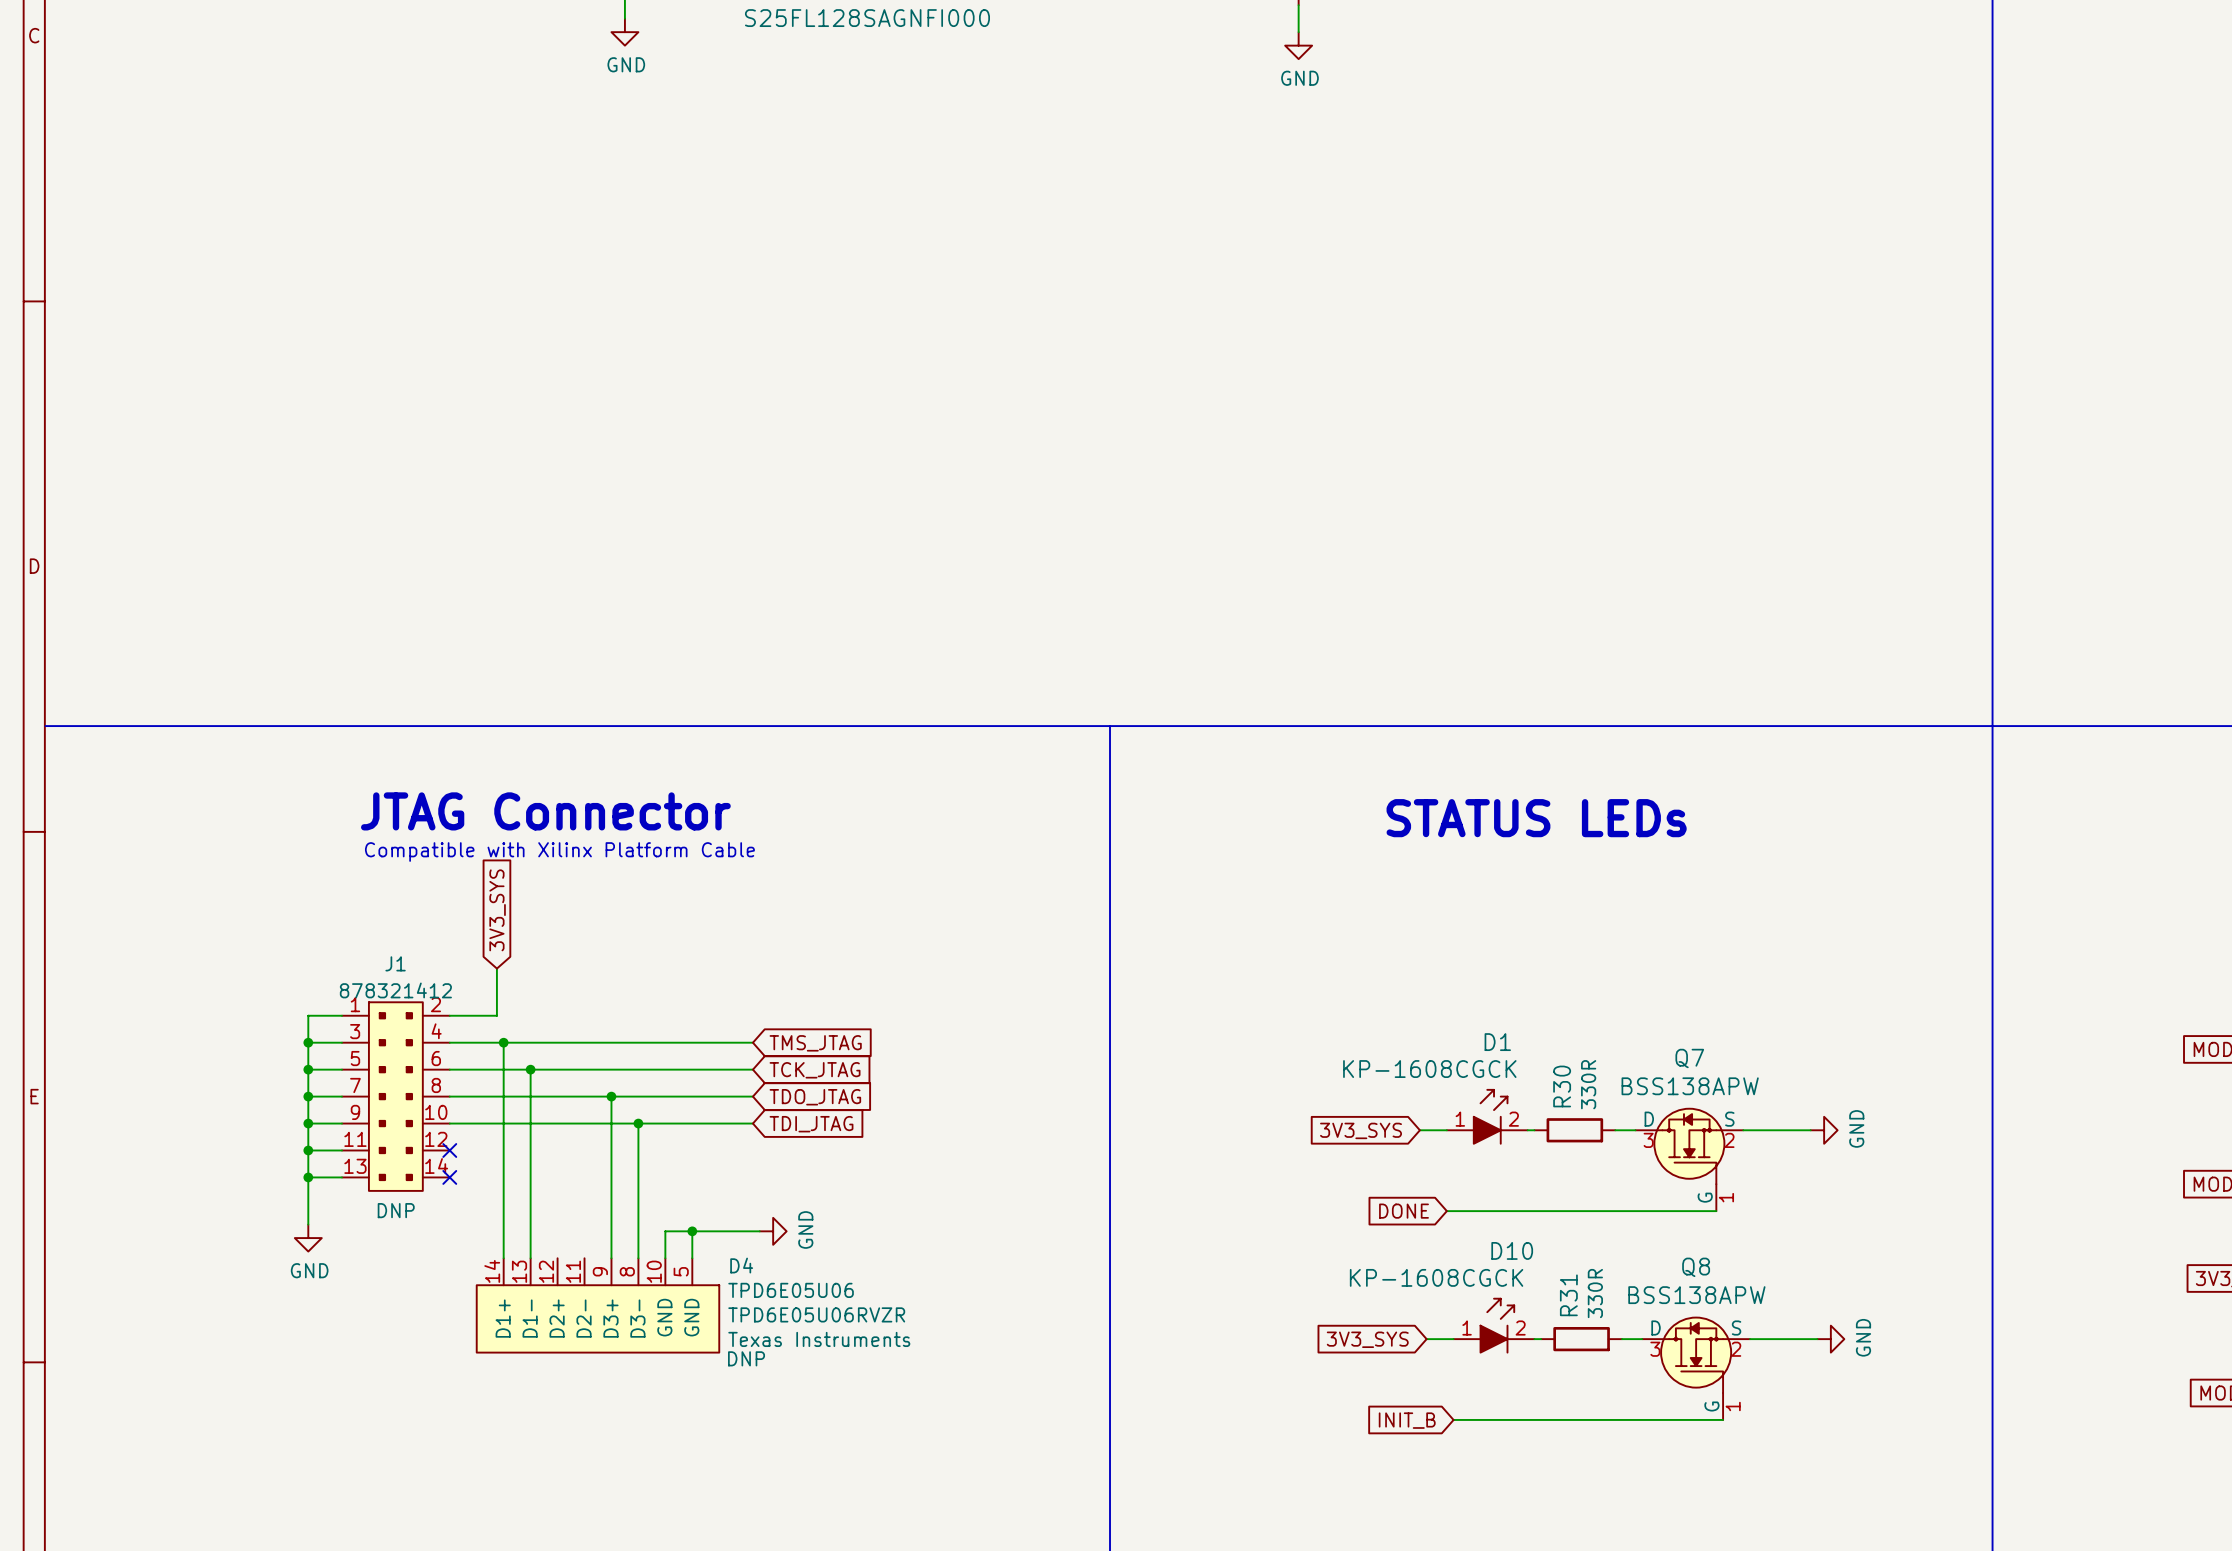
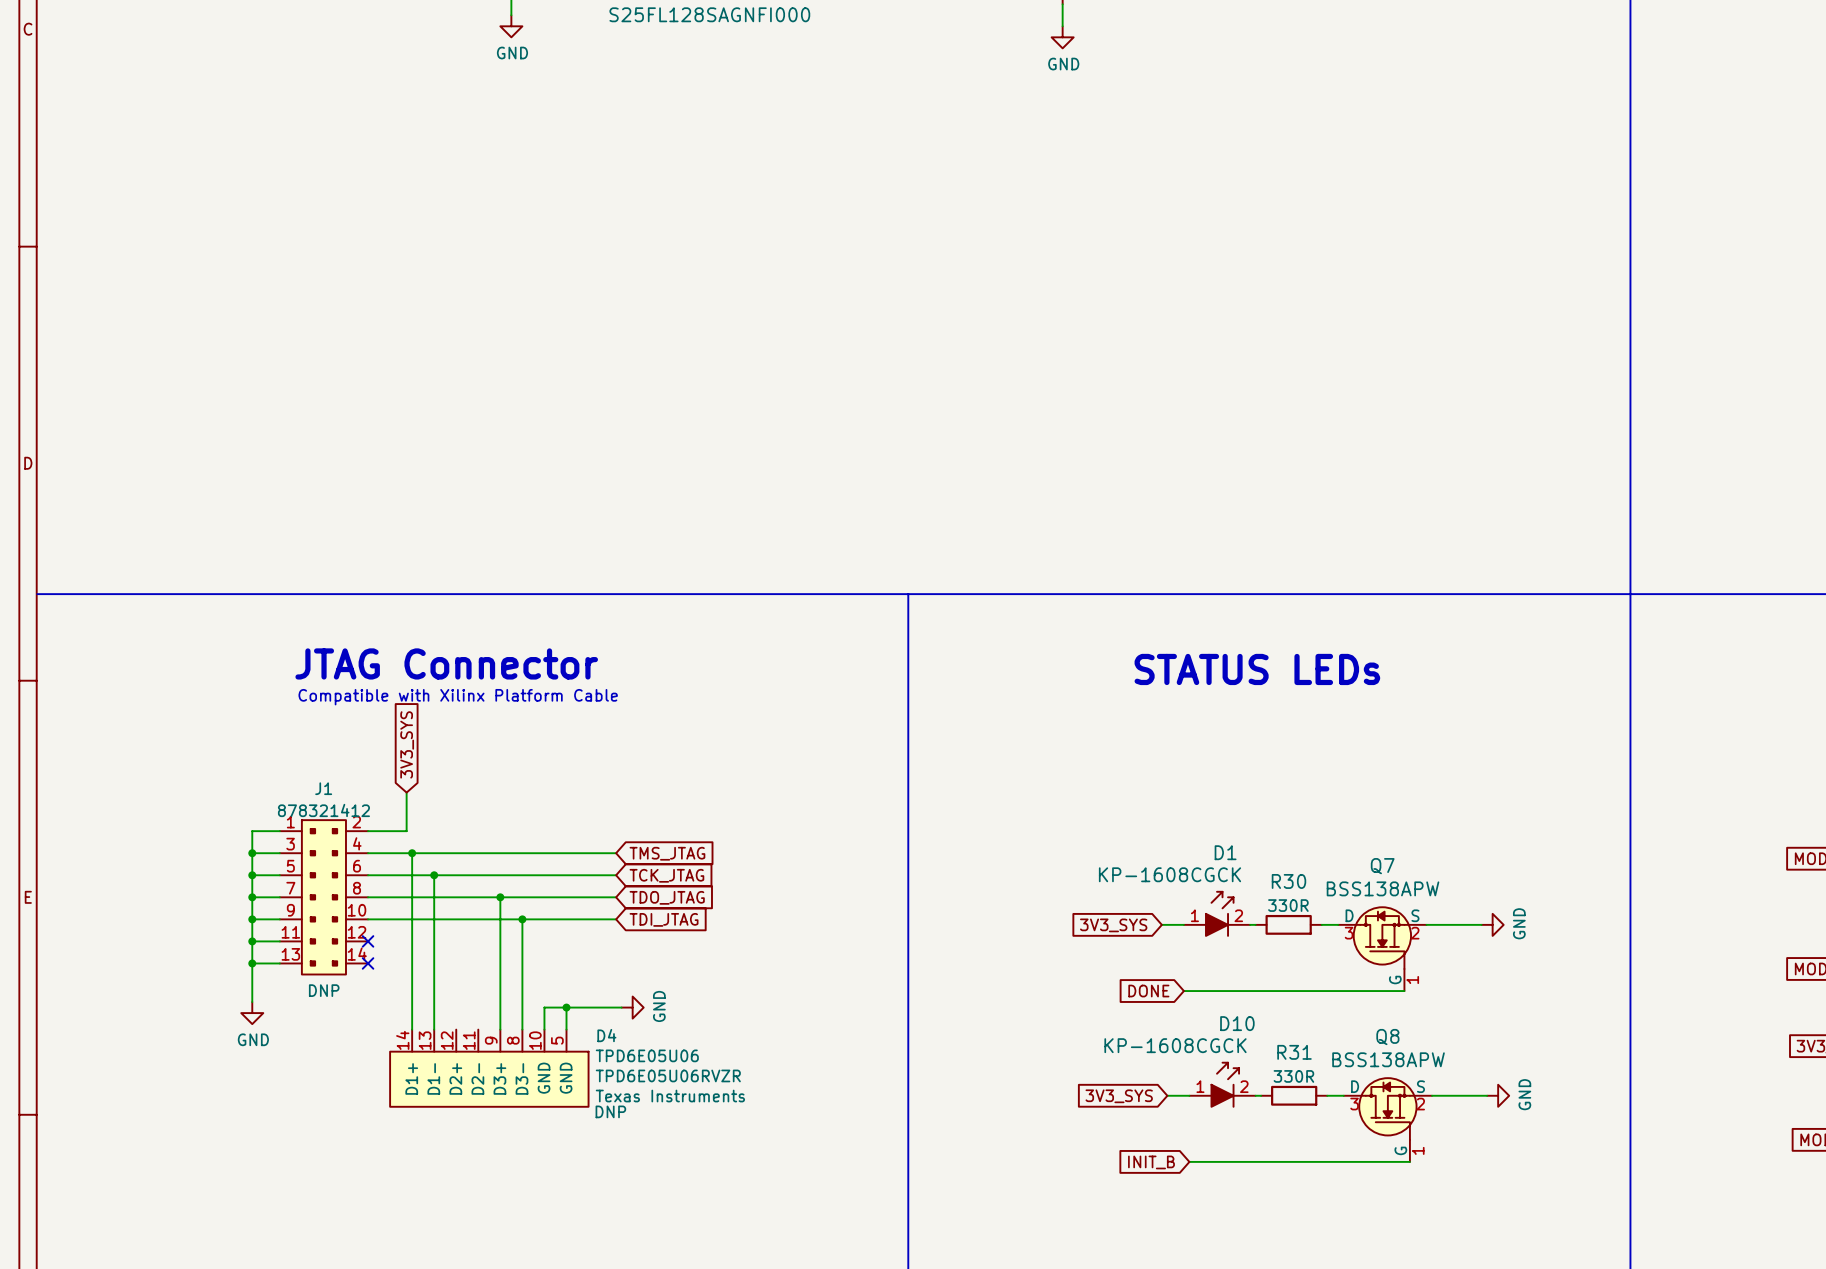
R30 text rotation: 0° (1588, 1084) -> 90° clockwise (1288, 905)
R30 name rotation: 0° (1562, 1086) -> 90° clockwise (1288, 881)
R31 text rotation: 0° (1595, 1293) -> 90° clockwise (1293, 1076)
R31 name rotation: 0° (1568, 1295) -> 90° clockwise (1294, 1052)

